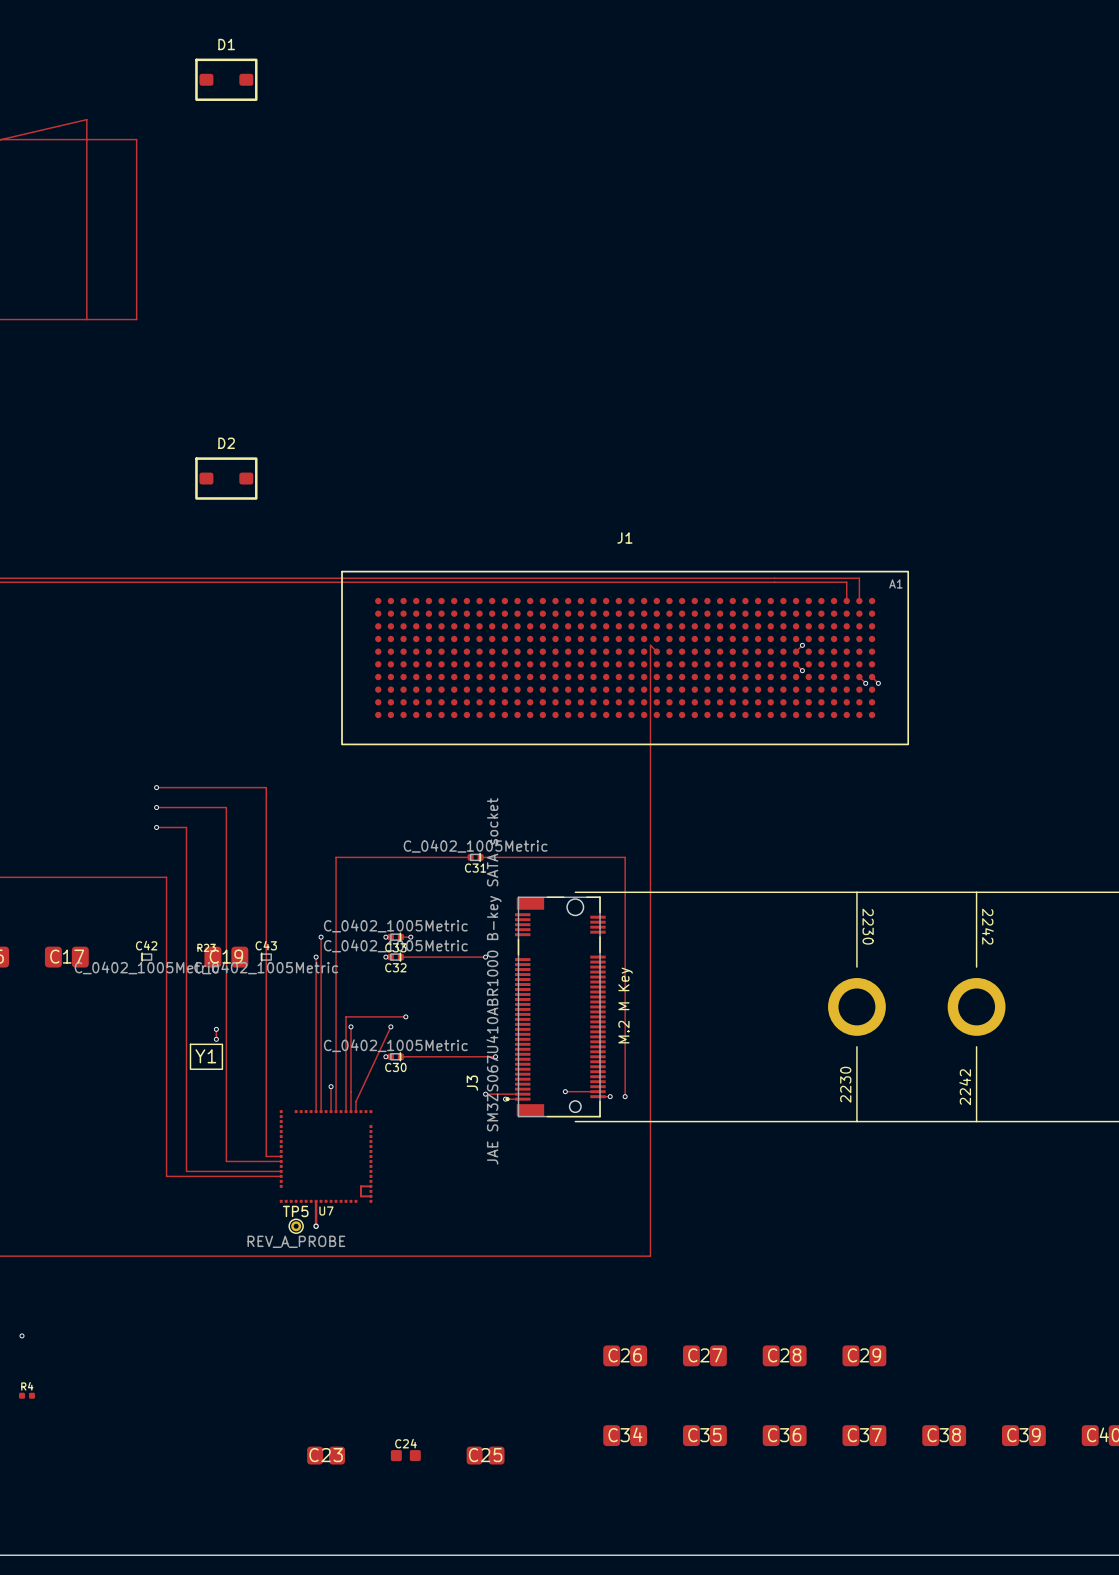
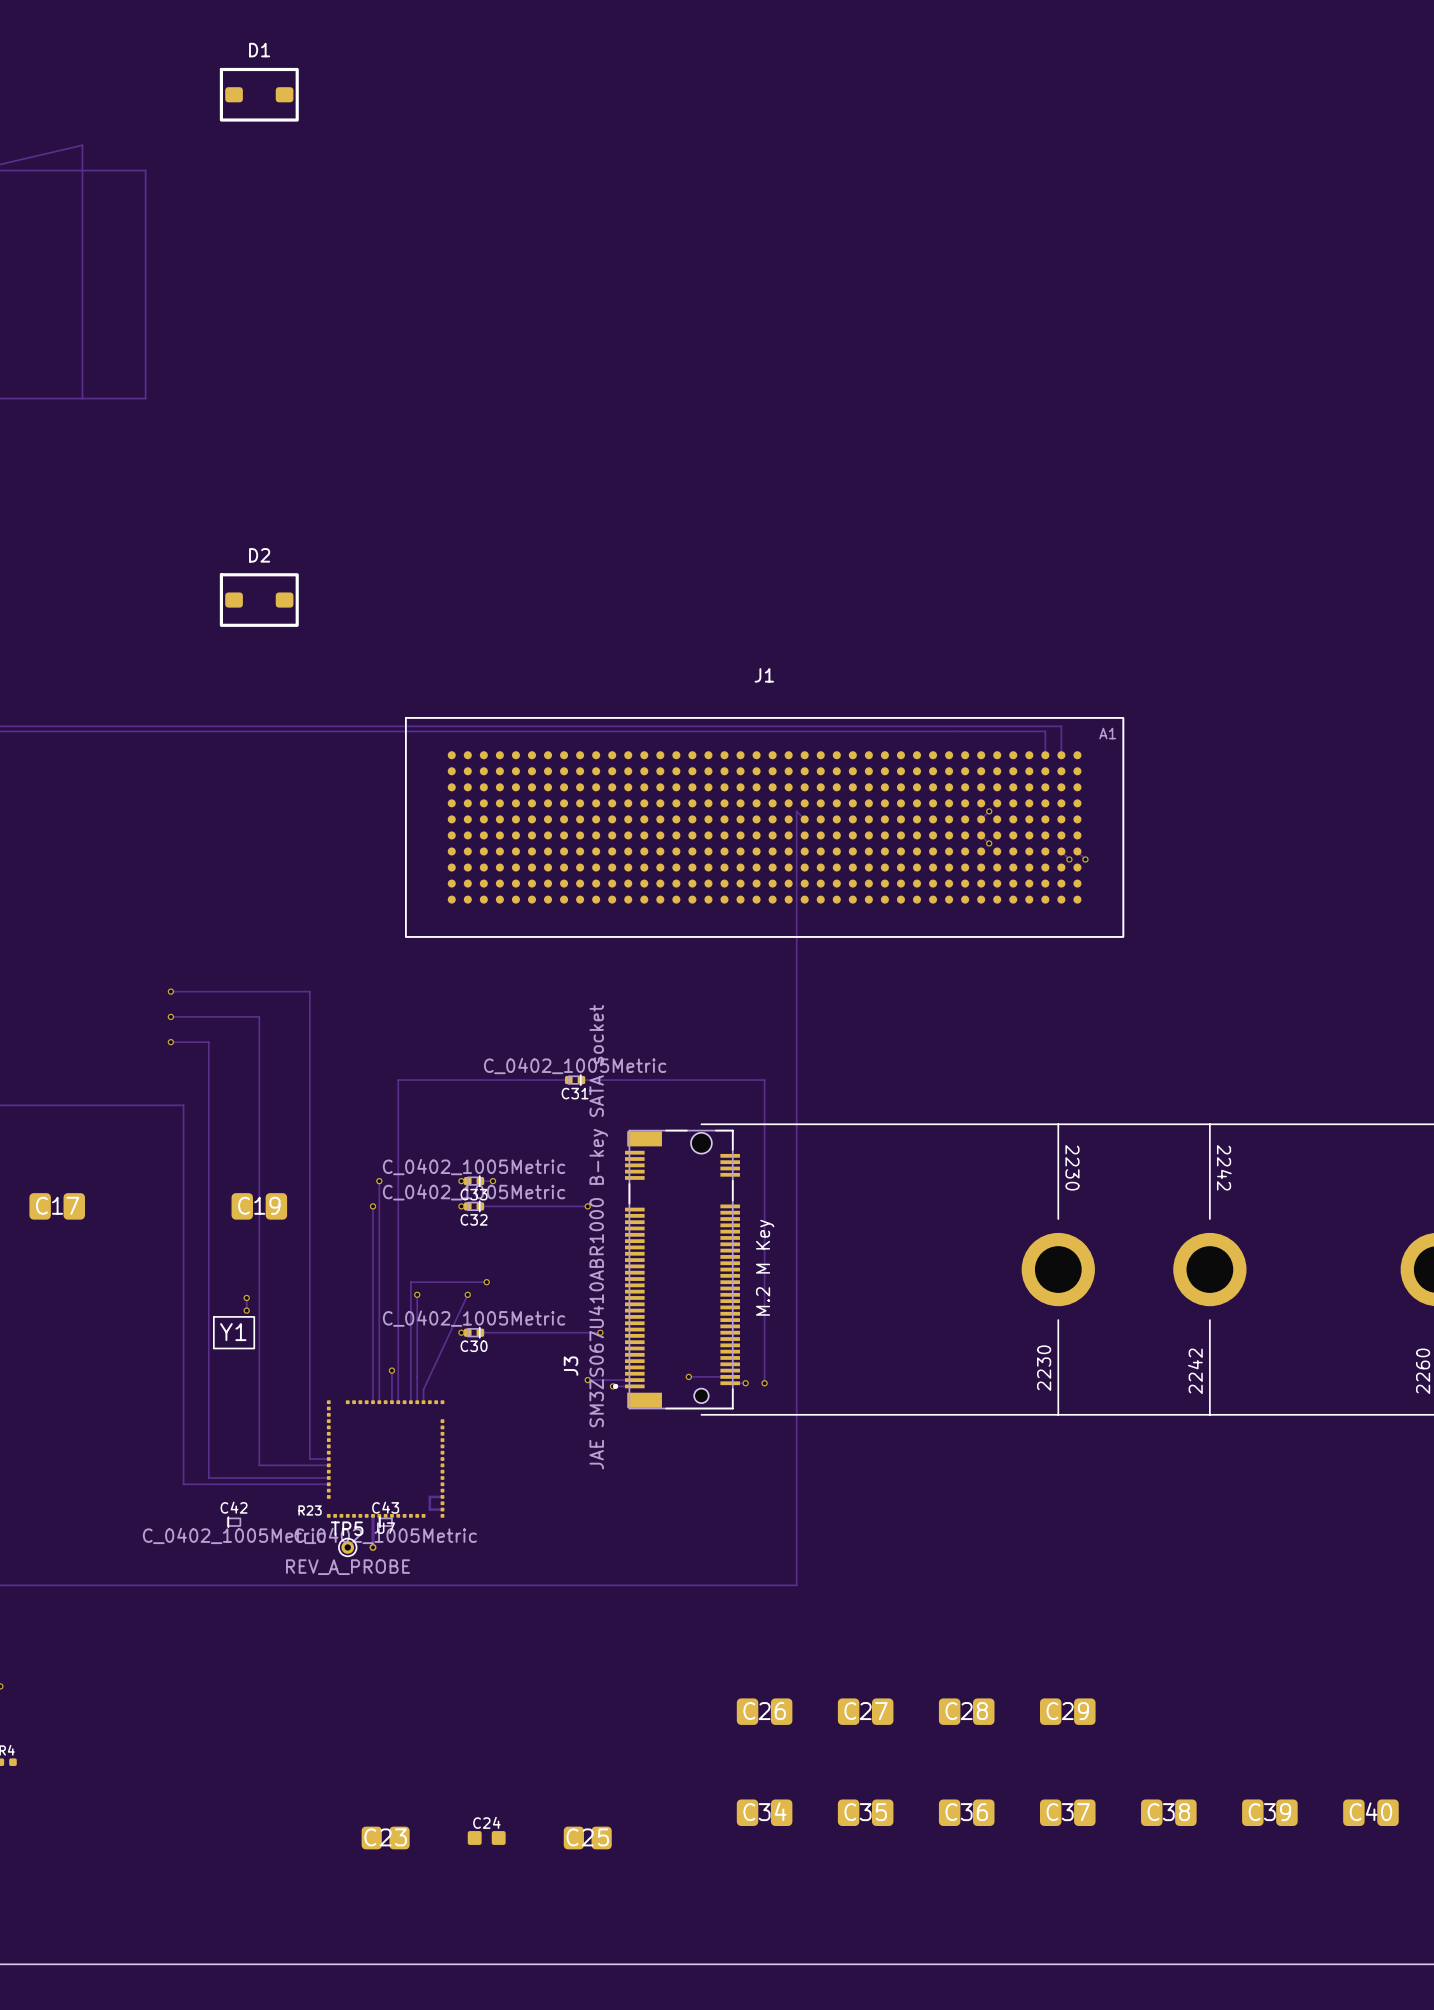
R23 position: (206, 947) -> (310, 1510)
C42 position: (146, 957) -> (234, 1522)
C43 position: (266, 957) -> (385, 1522)

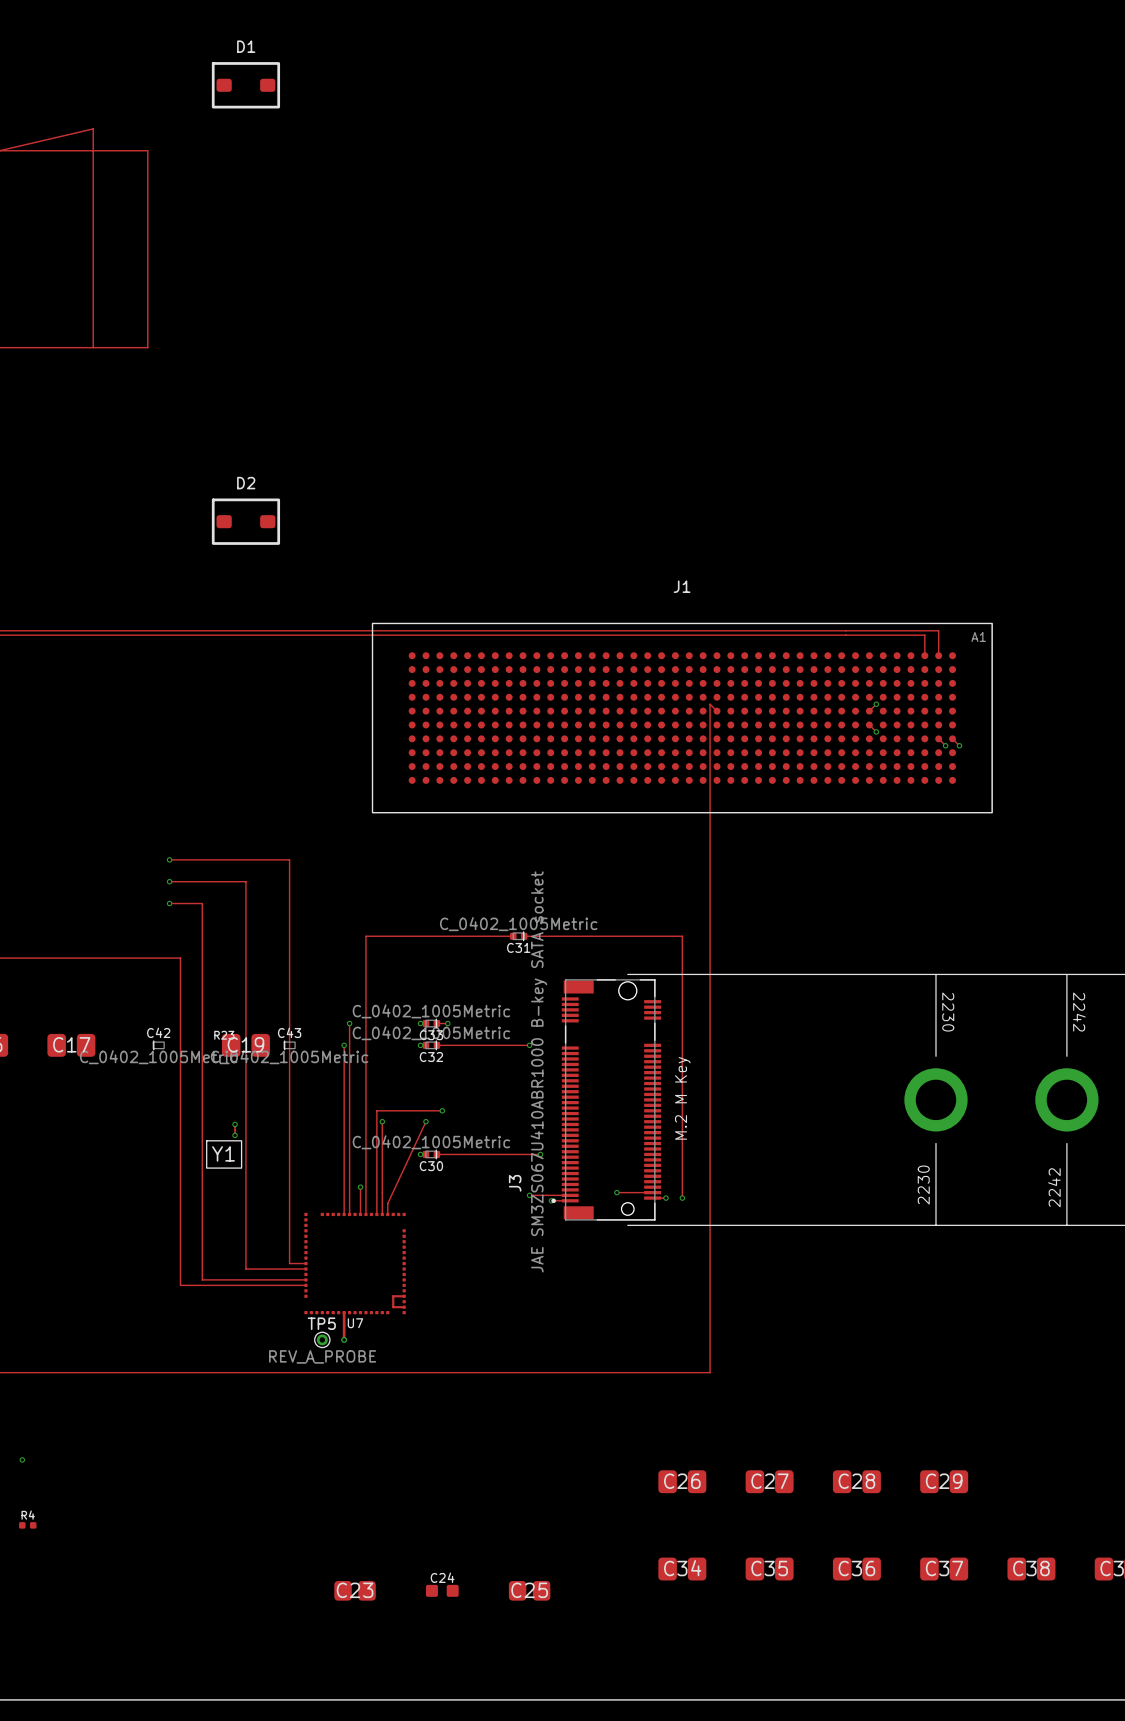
R23 position: (310, 1510) -> (224, 1035)
C42 position: (234, 1522) -> (158, 1045)
C43 position: (385, 1522) -> (289, 1045)

